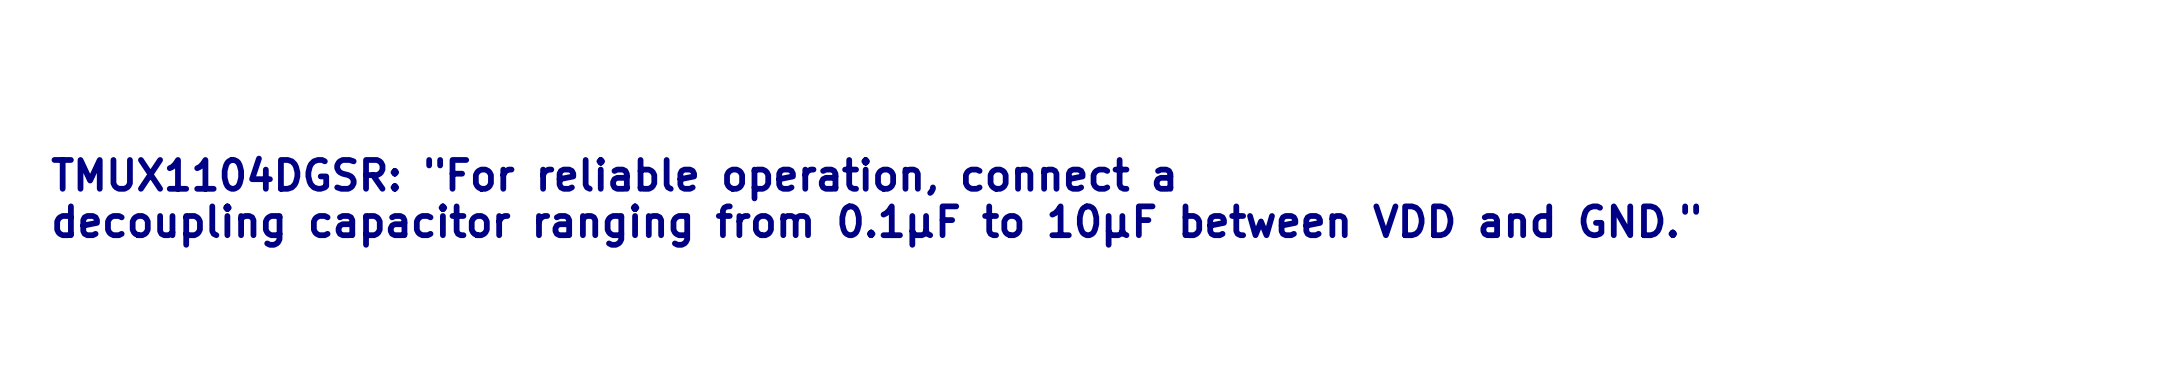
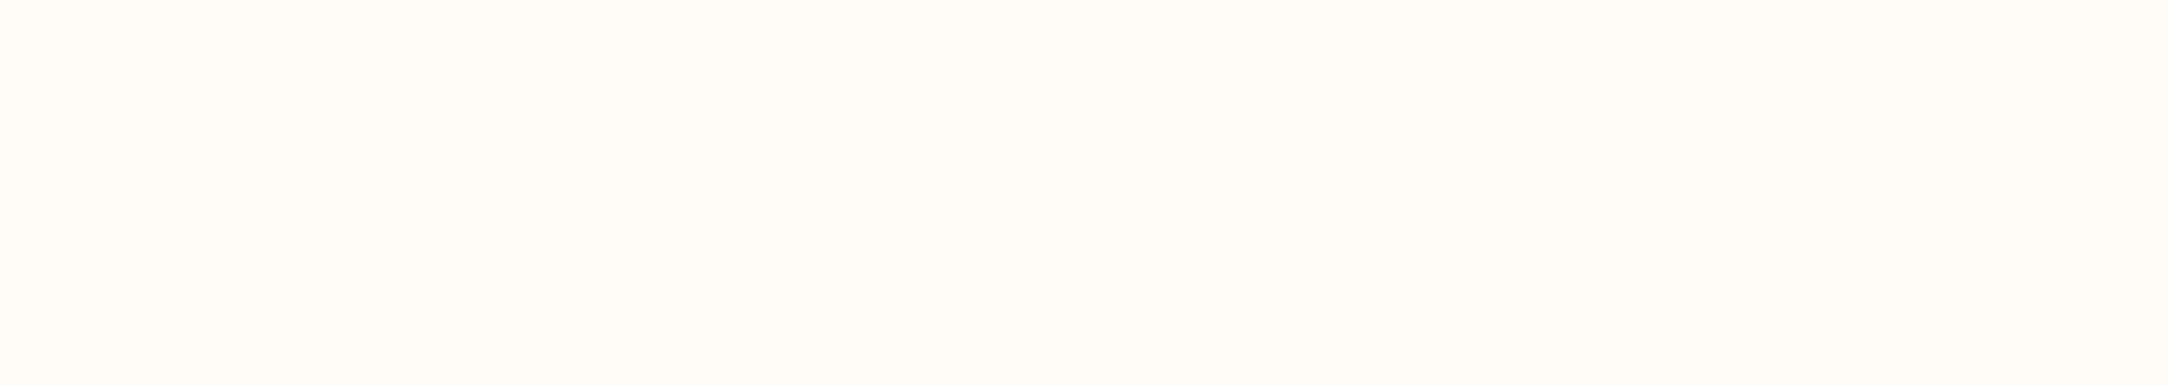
text: TMUX1104DGSR: "For reliable operation, connect a (612, 178) -> none
text: decoupling capacitor ranging from 0.1µF to 10µF between VDD and GND." (876, 225) -> none

